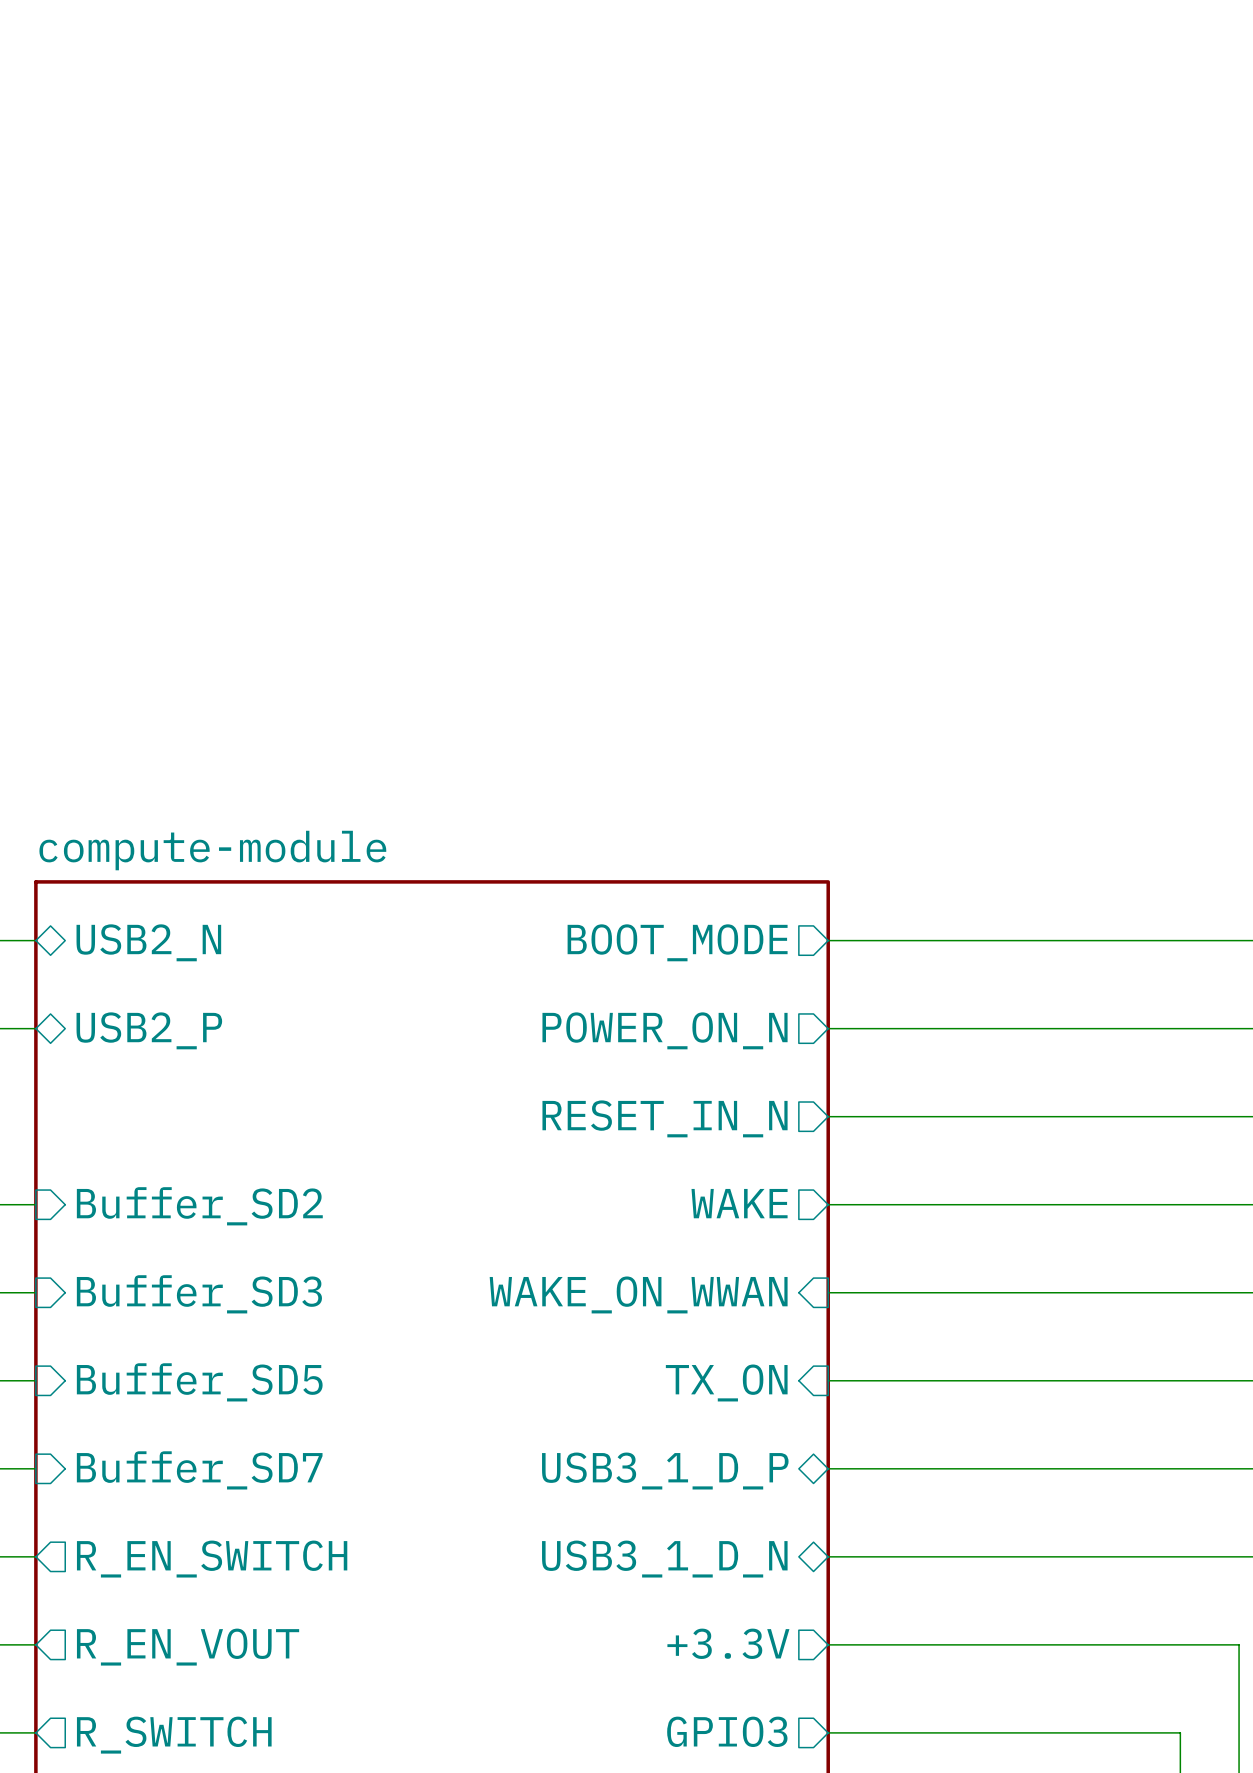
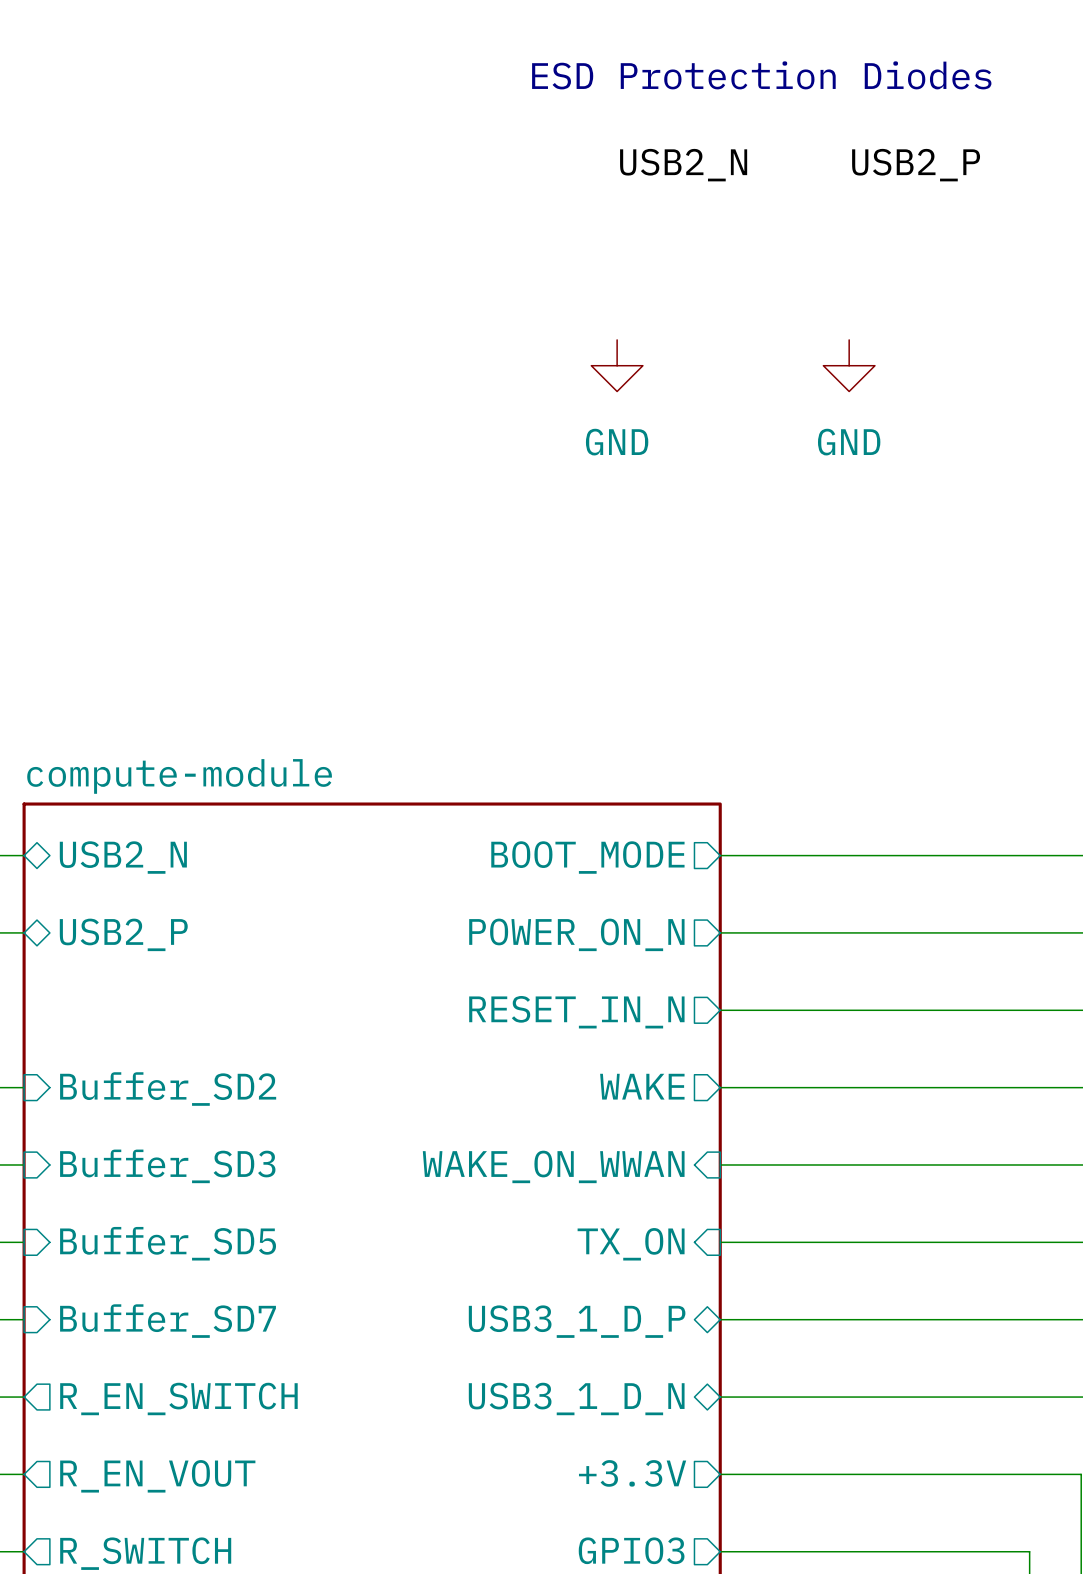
text: none -> ESD Protection Diodes (761, 75)
label: none -> USB2_N (683, 165)
label: none -> USB2_P (916, 165)
power symbol: none -> GND (617, 365)
power symbol: none -> GND (849, 365)

